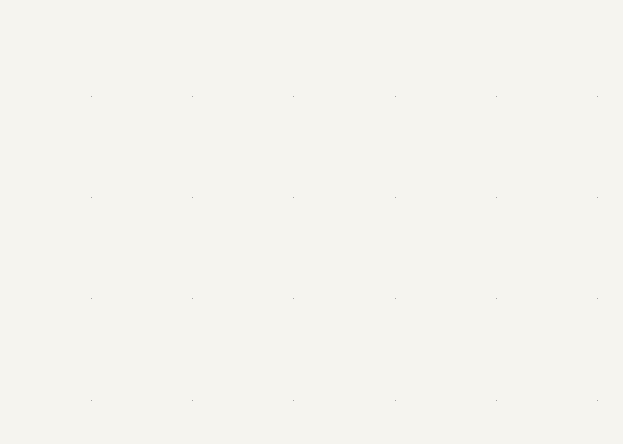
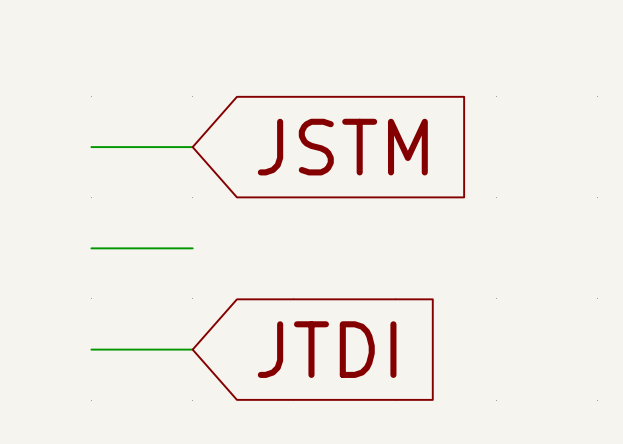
wire: none -> (91, 147) (192, 147)
global label: none -> JSTM (342, 147)
wire: none -> (91, 248) (192, 248)
wire: none -> (91, 349) (192, 349)
global label: none -> JTDI (327, 349)

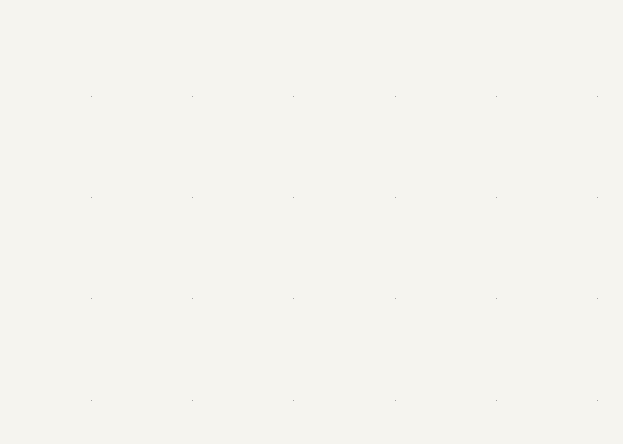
wire: (91, 147) (192, 147) -> none
global label: JSTM (342, 147) -> none
wire: (91, 248) (192, 248) -> none
wire: (91, 349) (192, 349) -> none
global label: JTDI (327, 349) -> none

